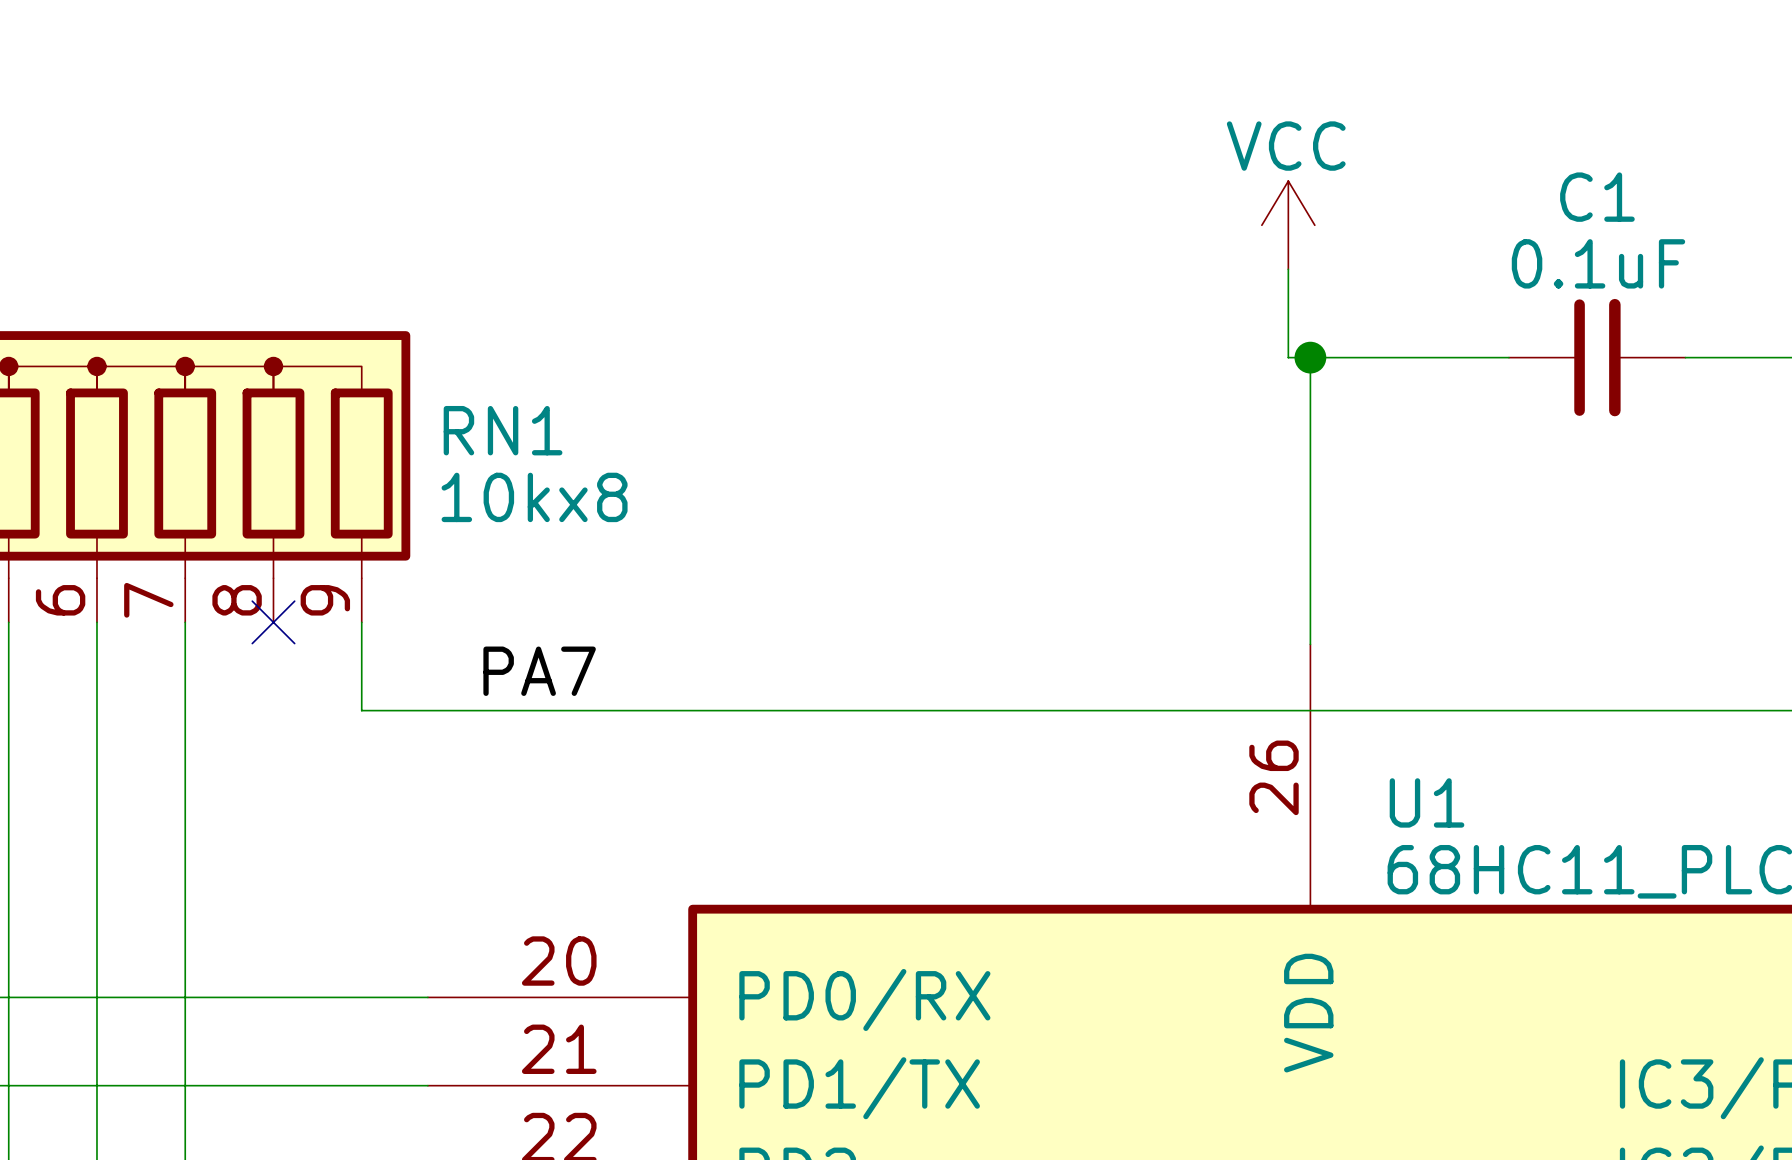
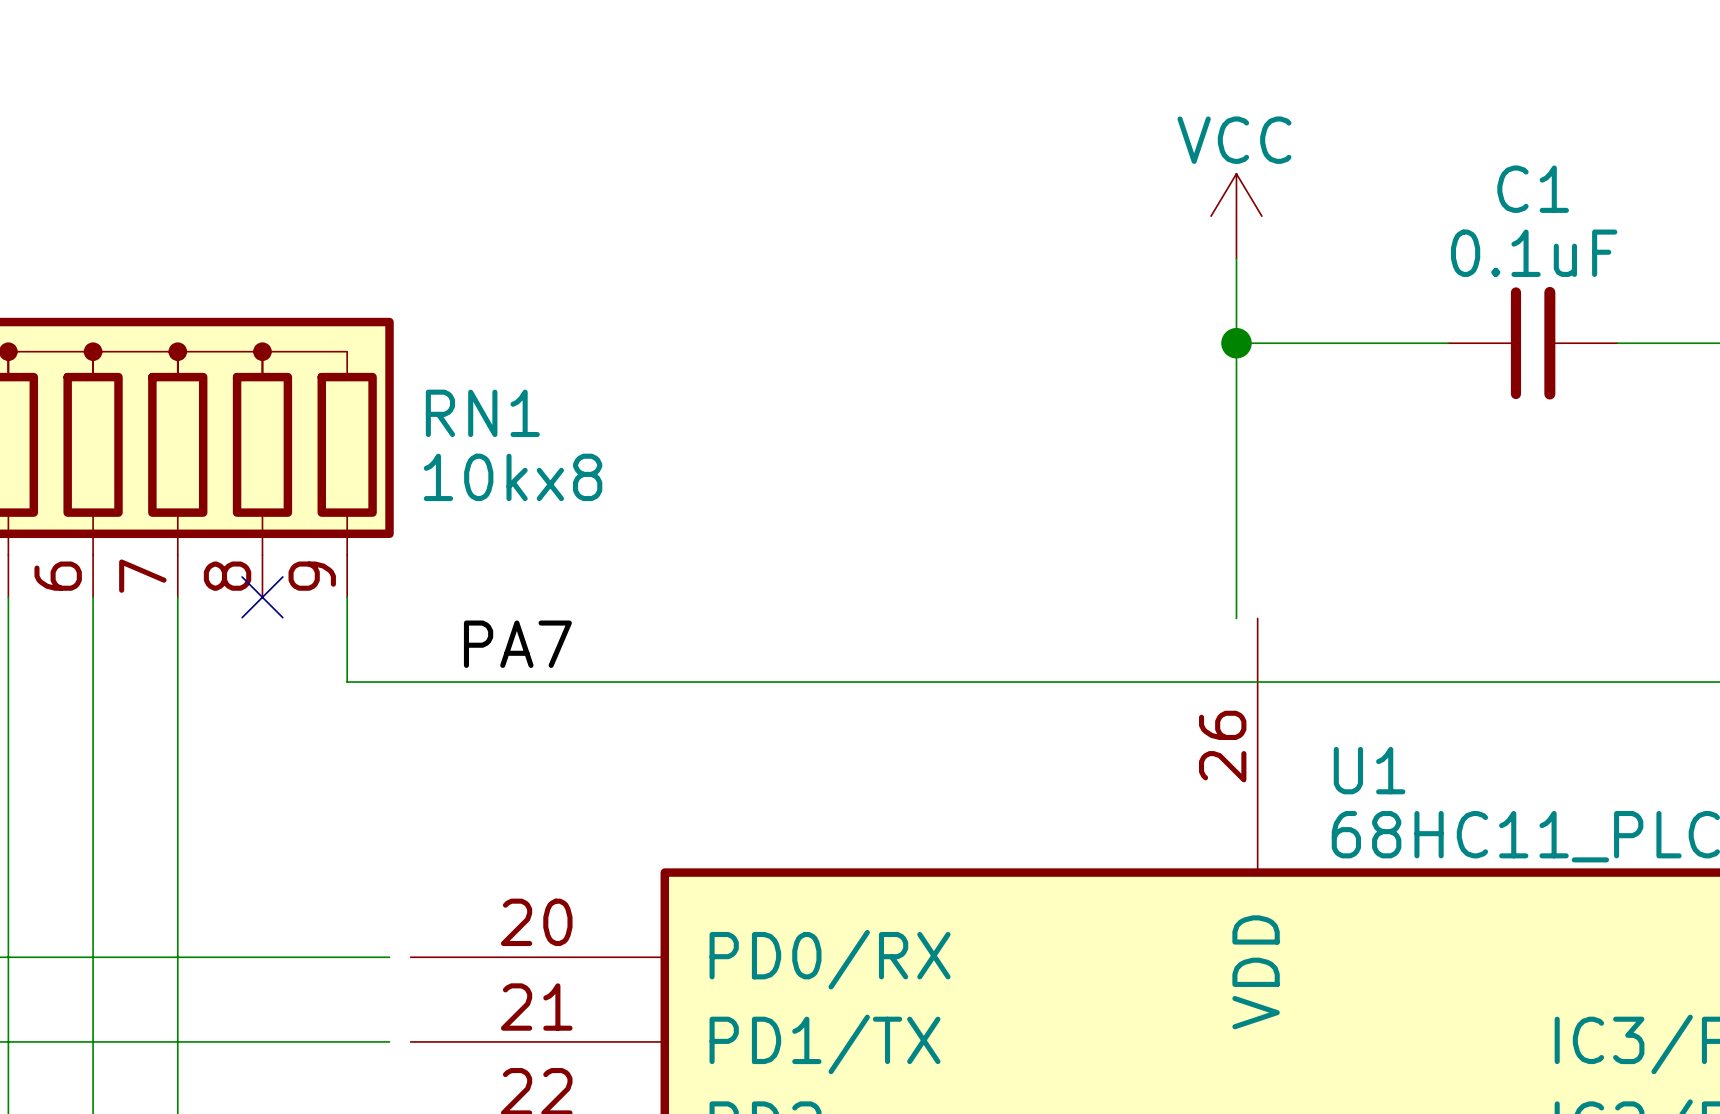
wire: (1310, 357) (1310, 644) -> (1236, 343) (1236, 618)
junction position: (1310, 357) -> (1236, 343)
wire: (405, 997) (427, 997) -> none
wire: (405, 1085) (427, 1085) -> none

